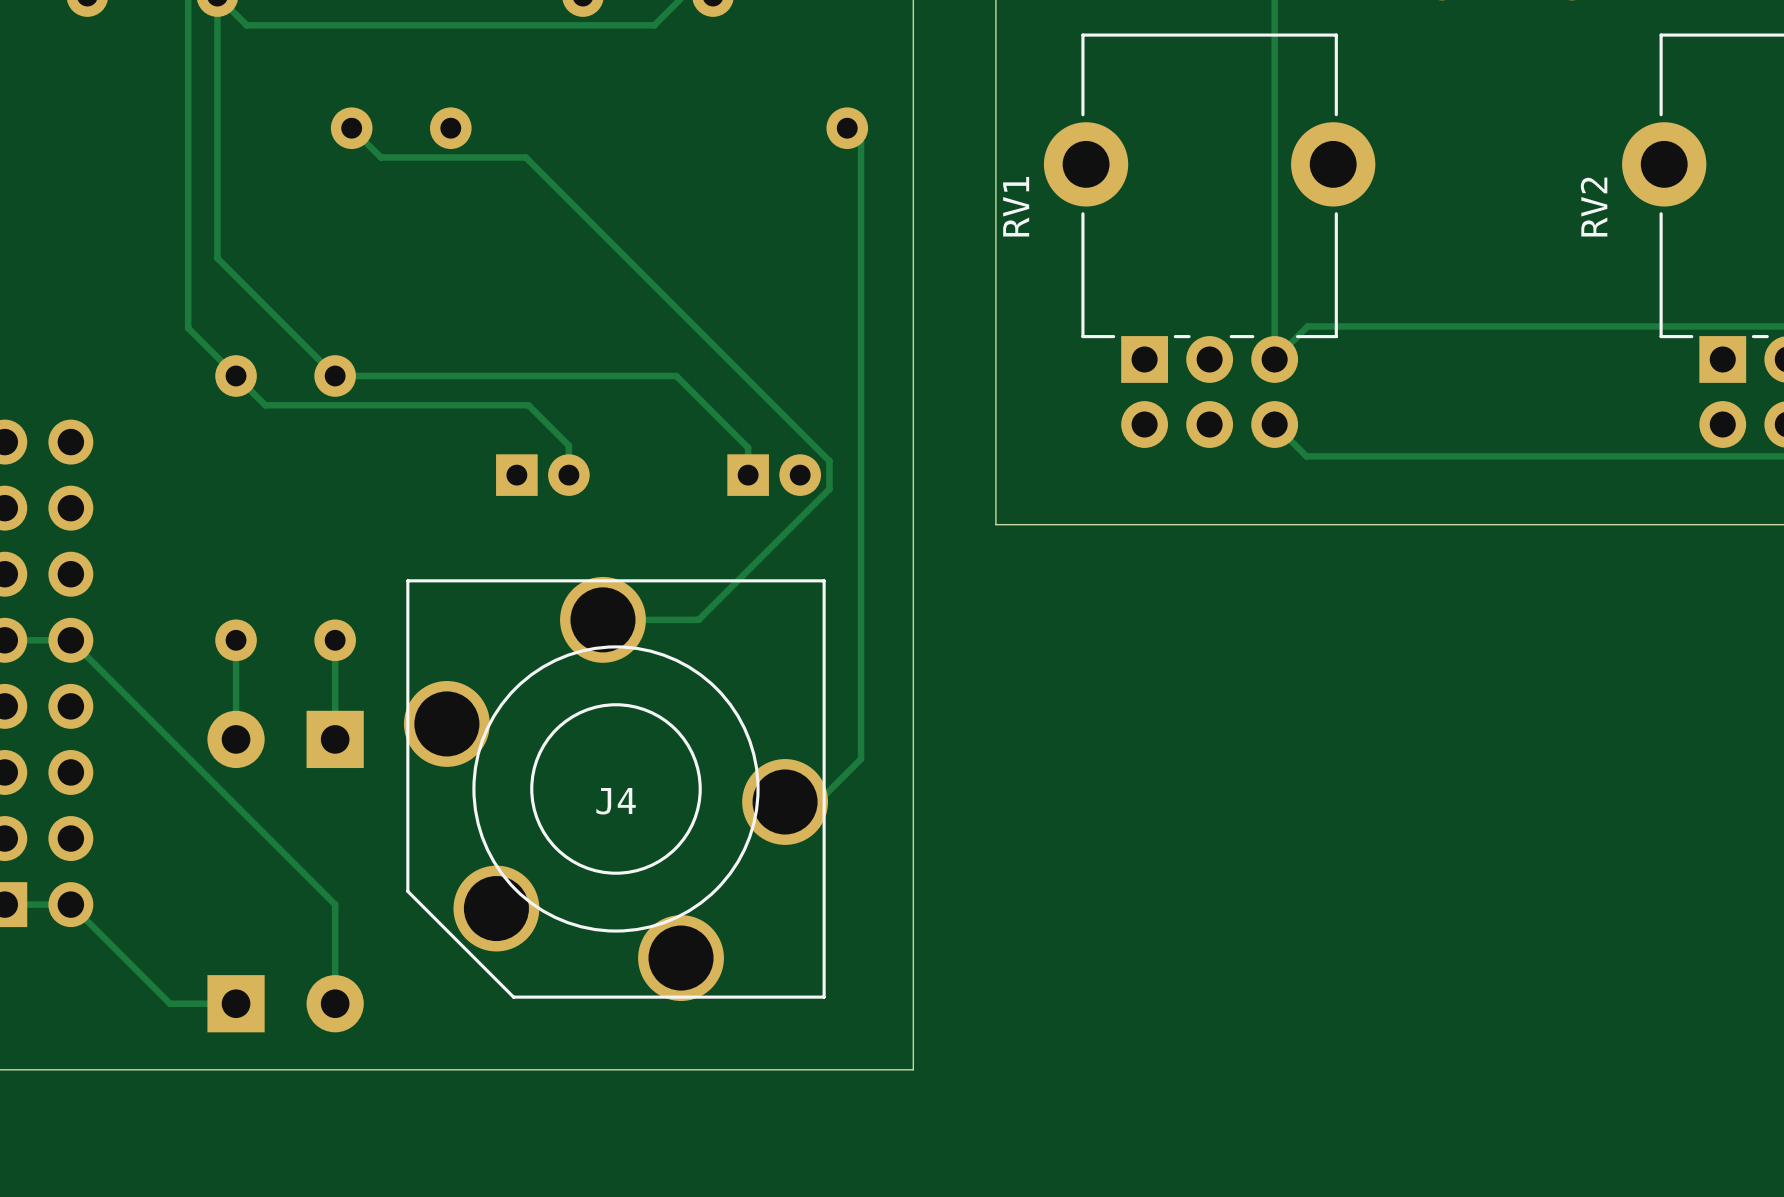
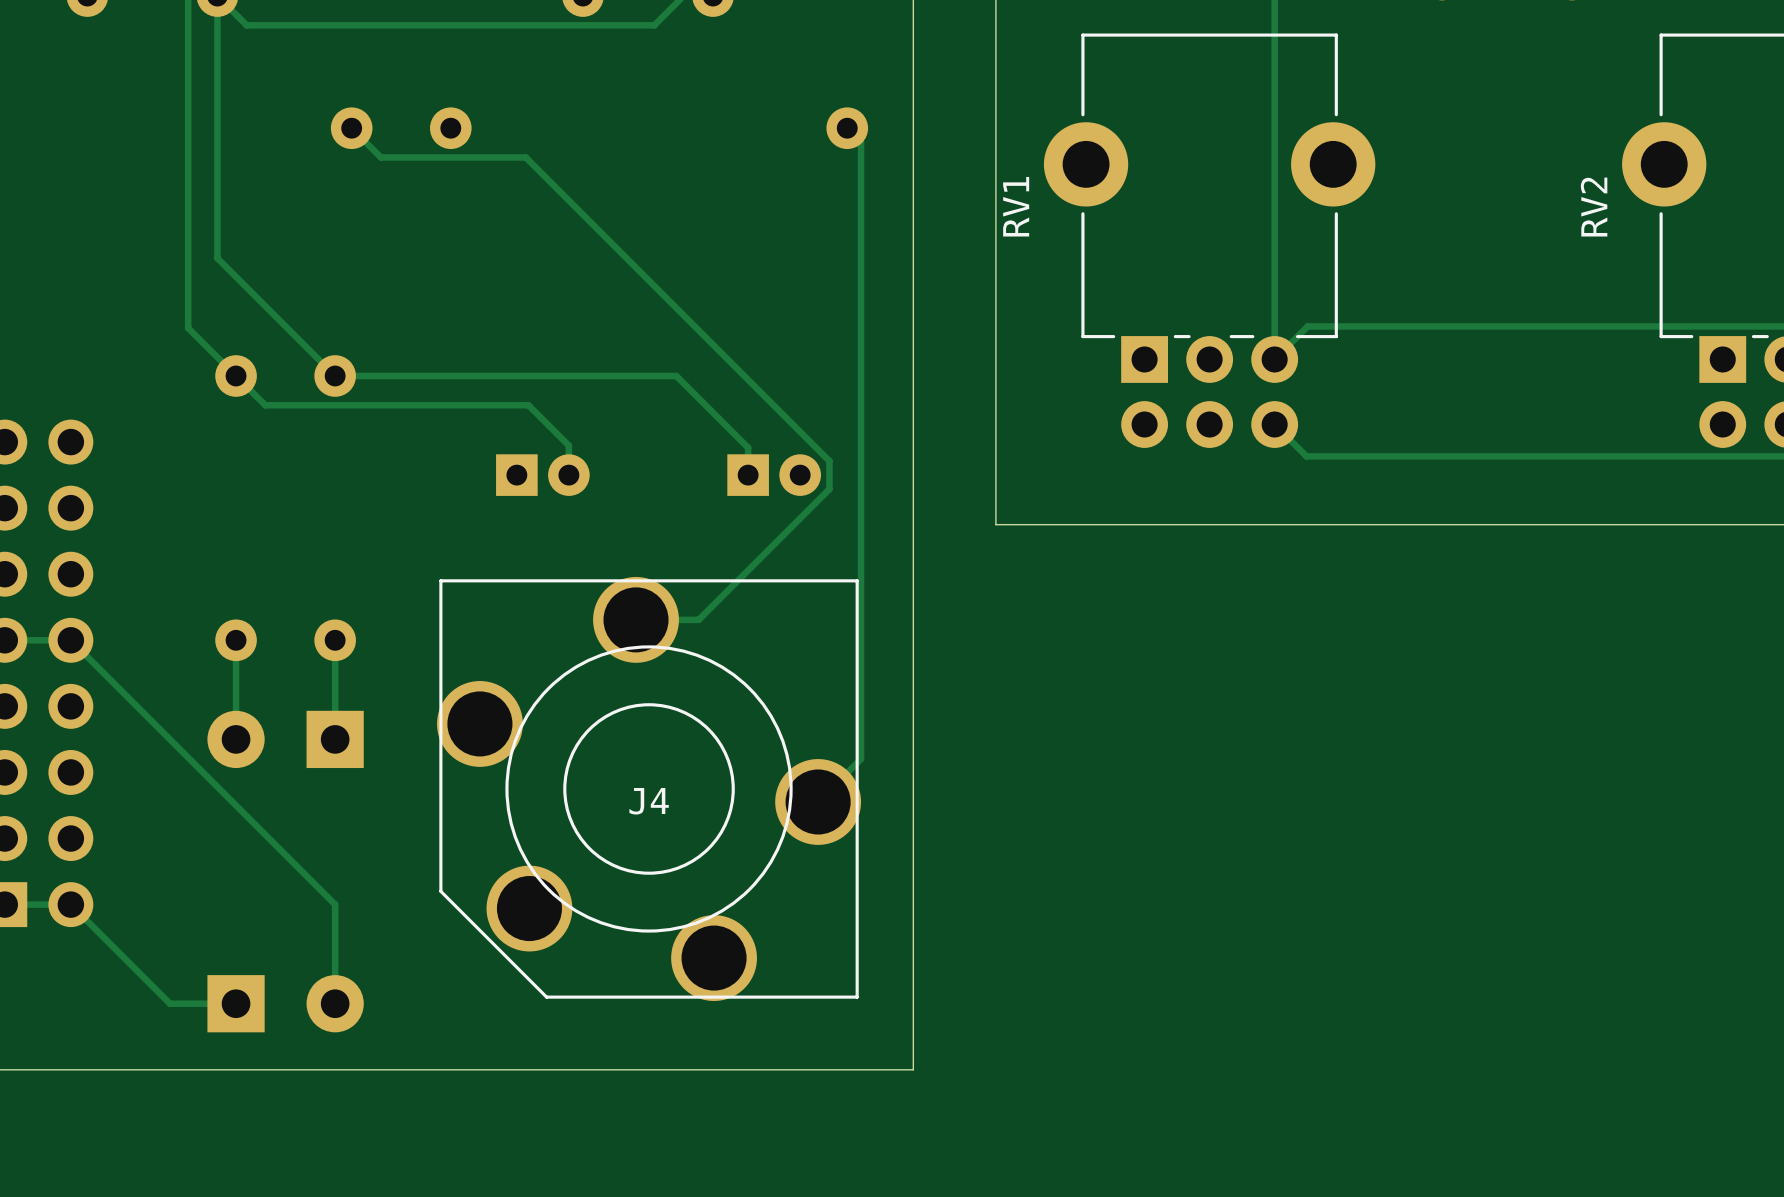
J4 position: (615, 788) -> (649, 788)

